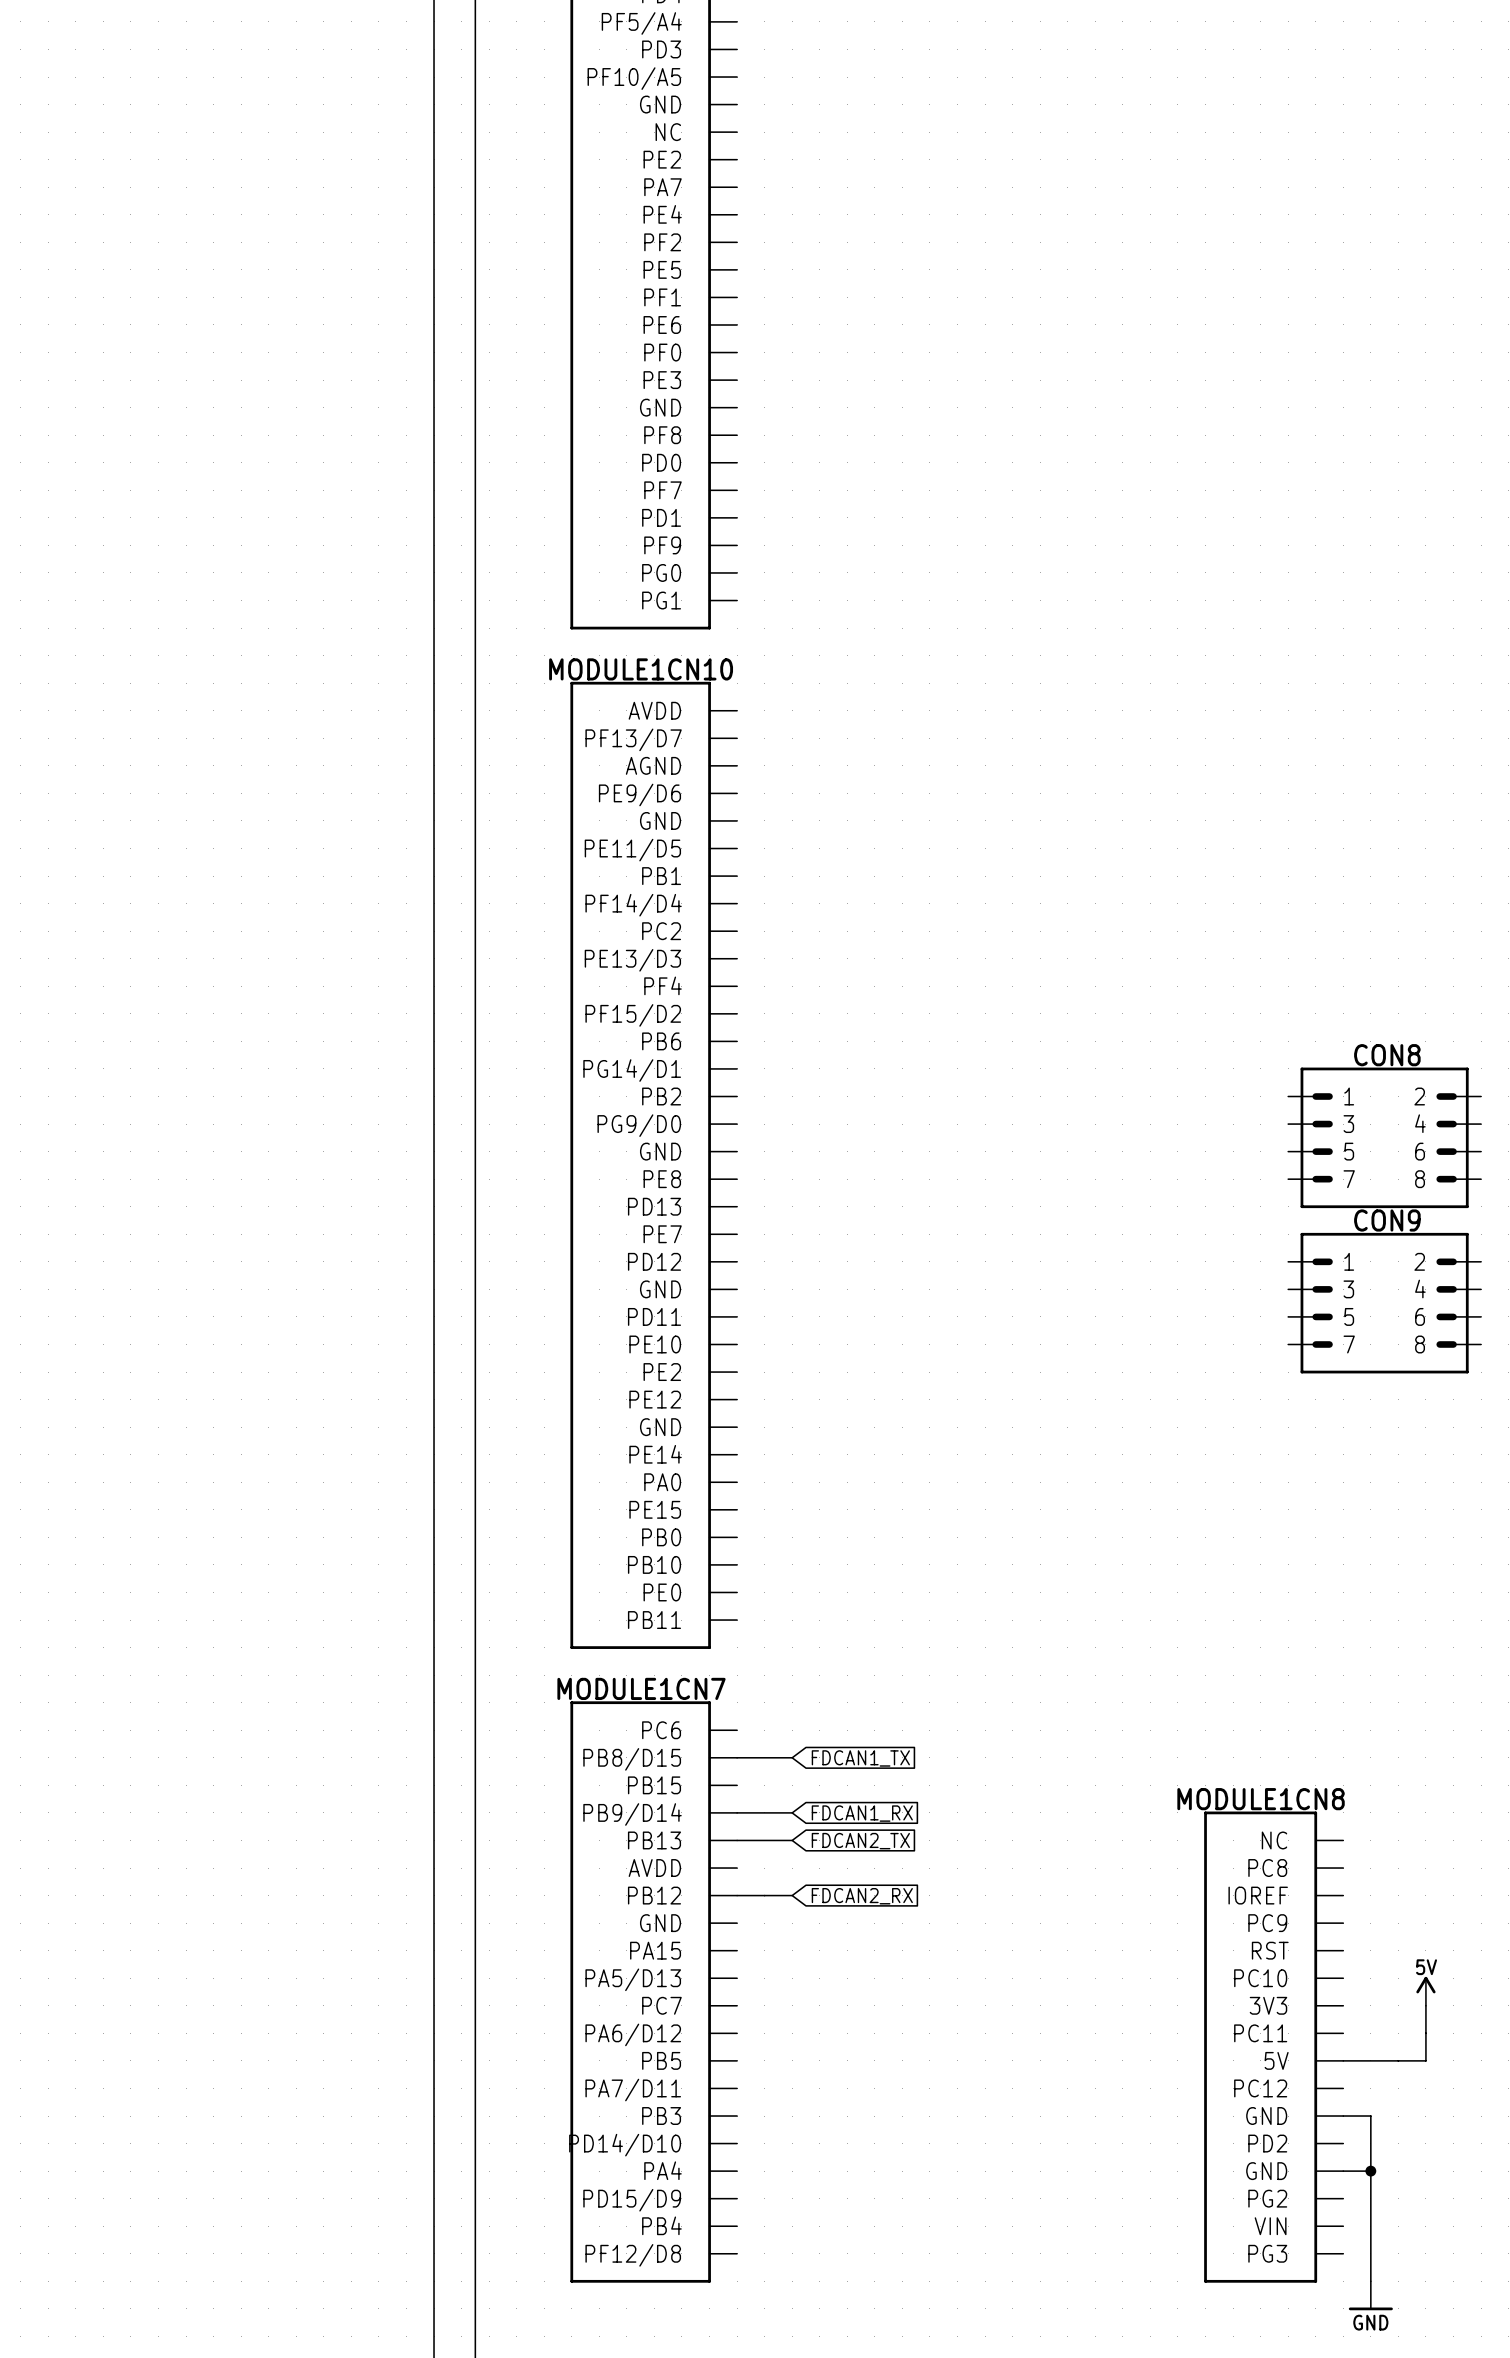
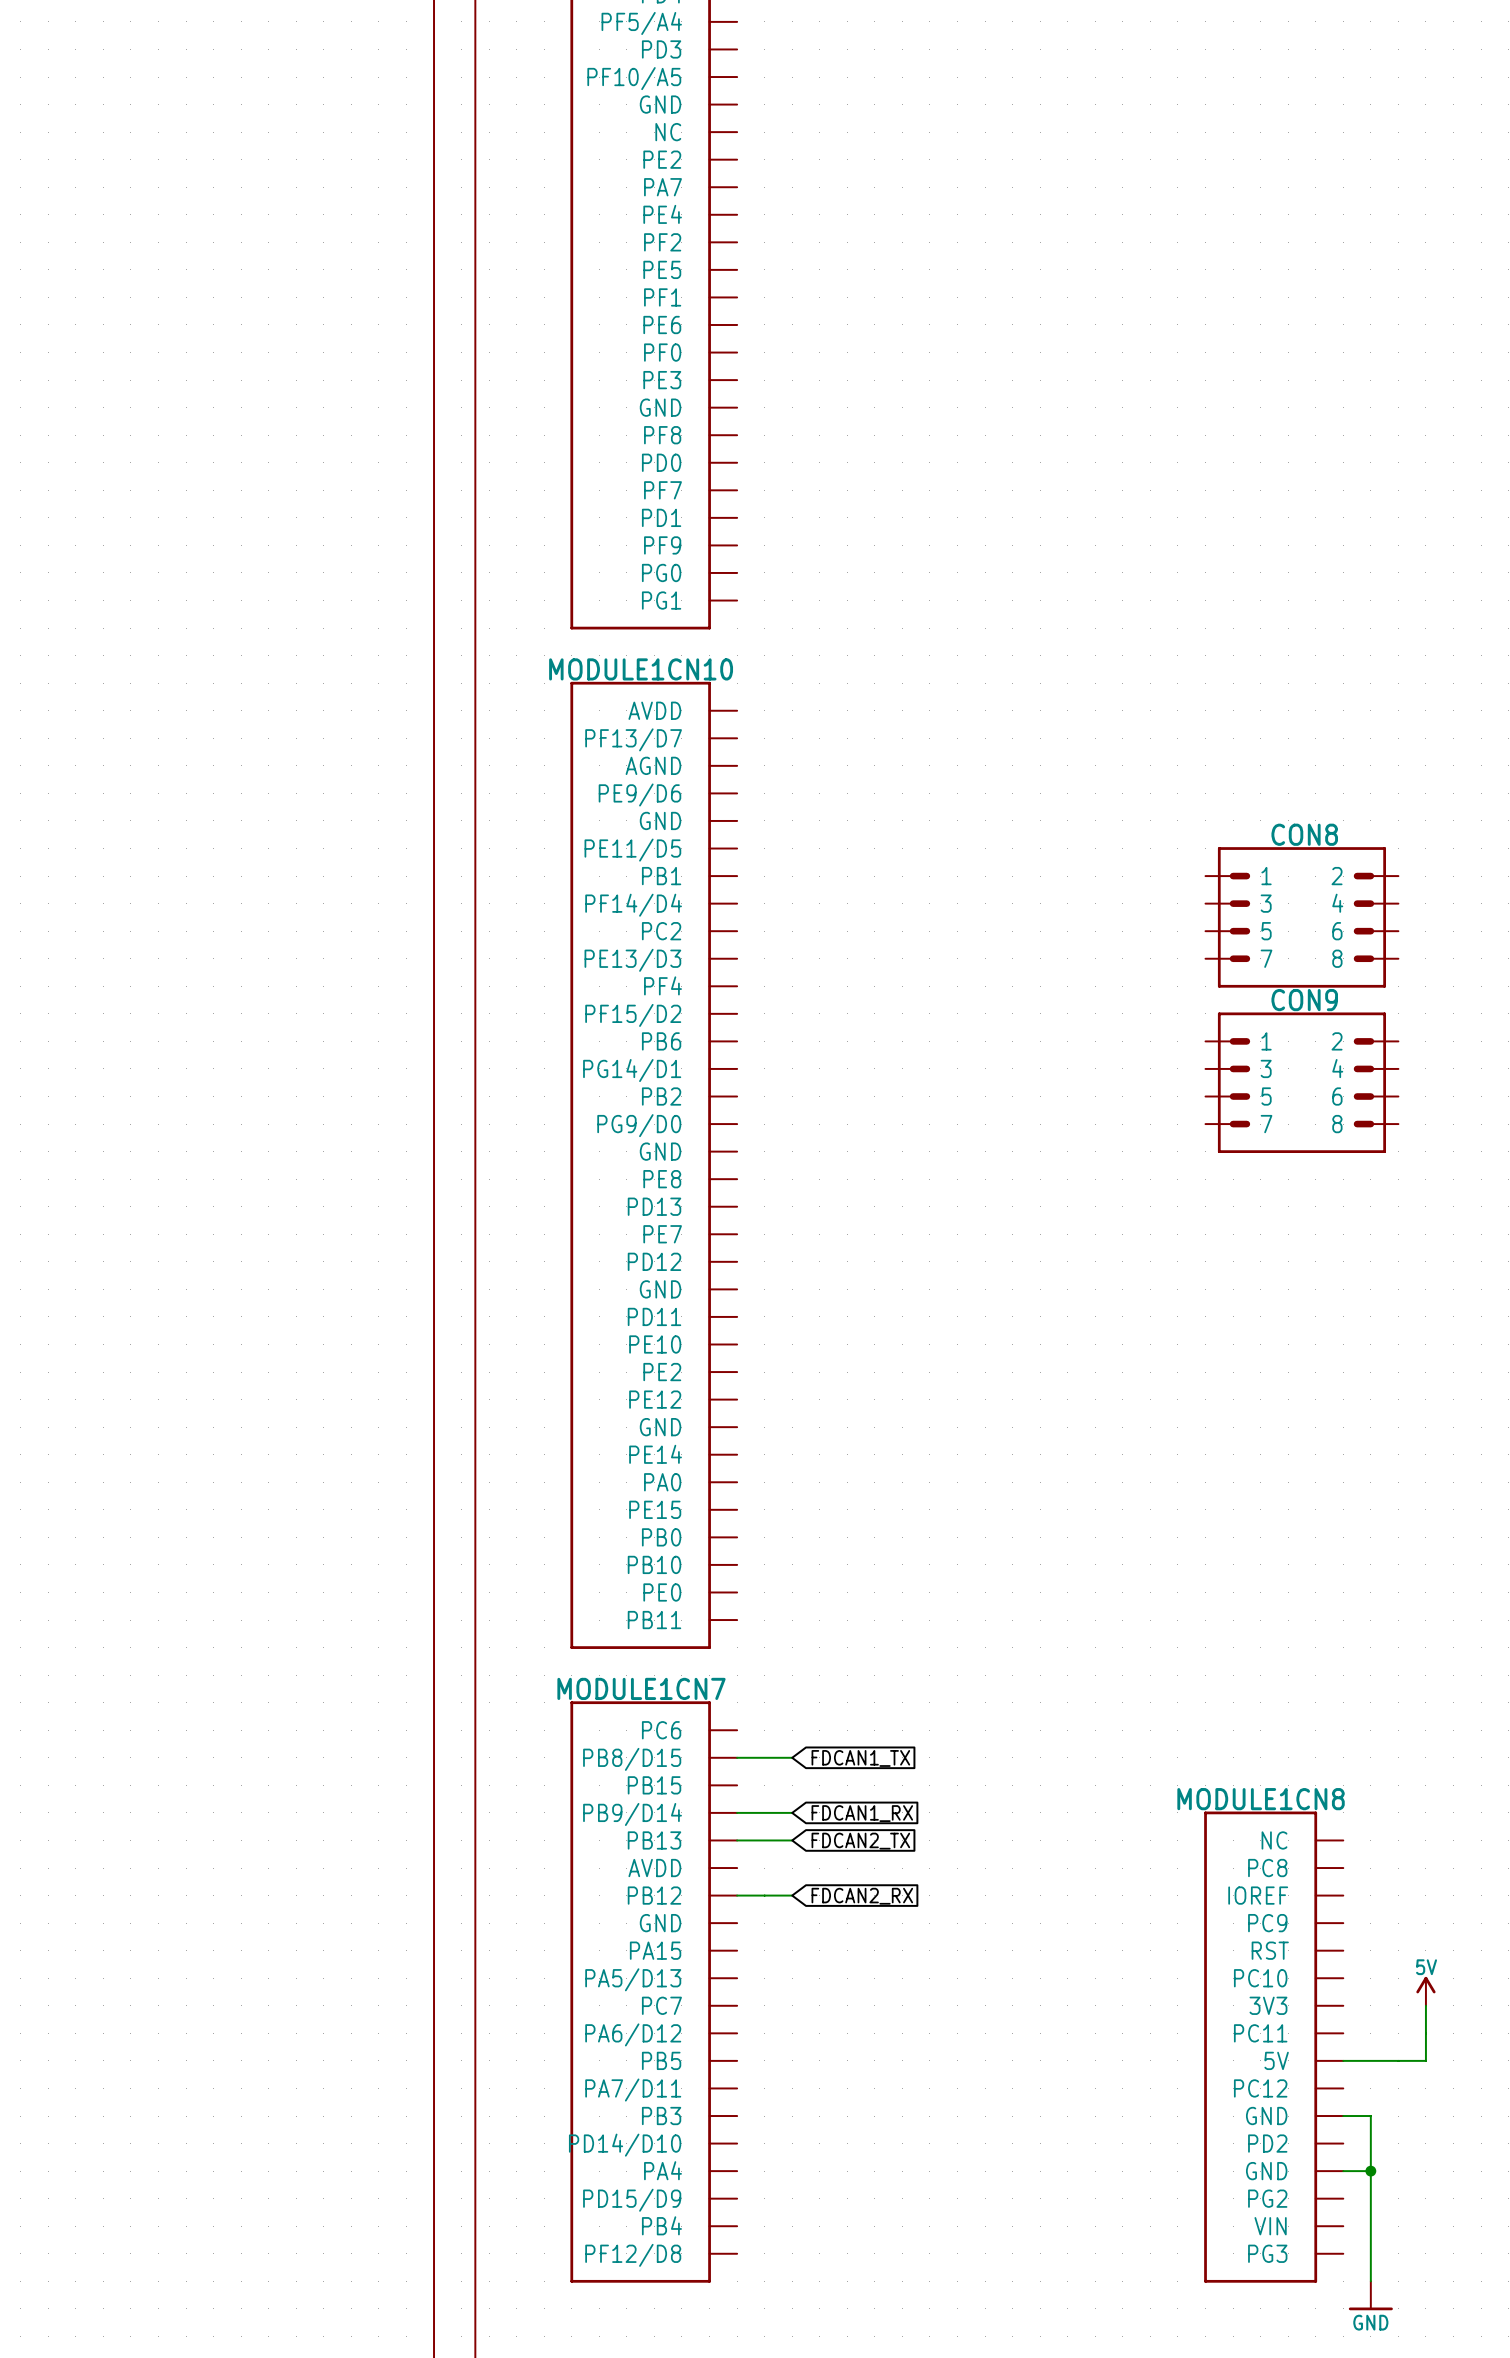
CON8 position: (1384, 1137) -> (1301, 917)
CON9 position: (1384, 1303) -> (1301, 1082)

